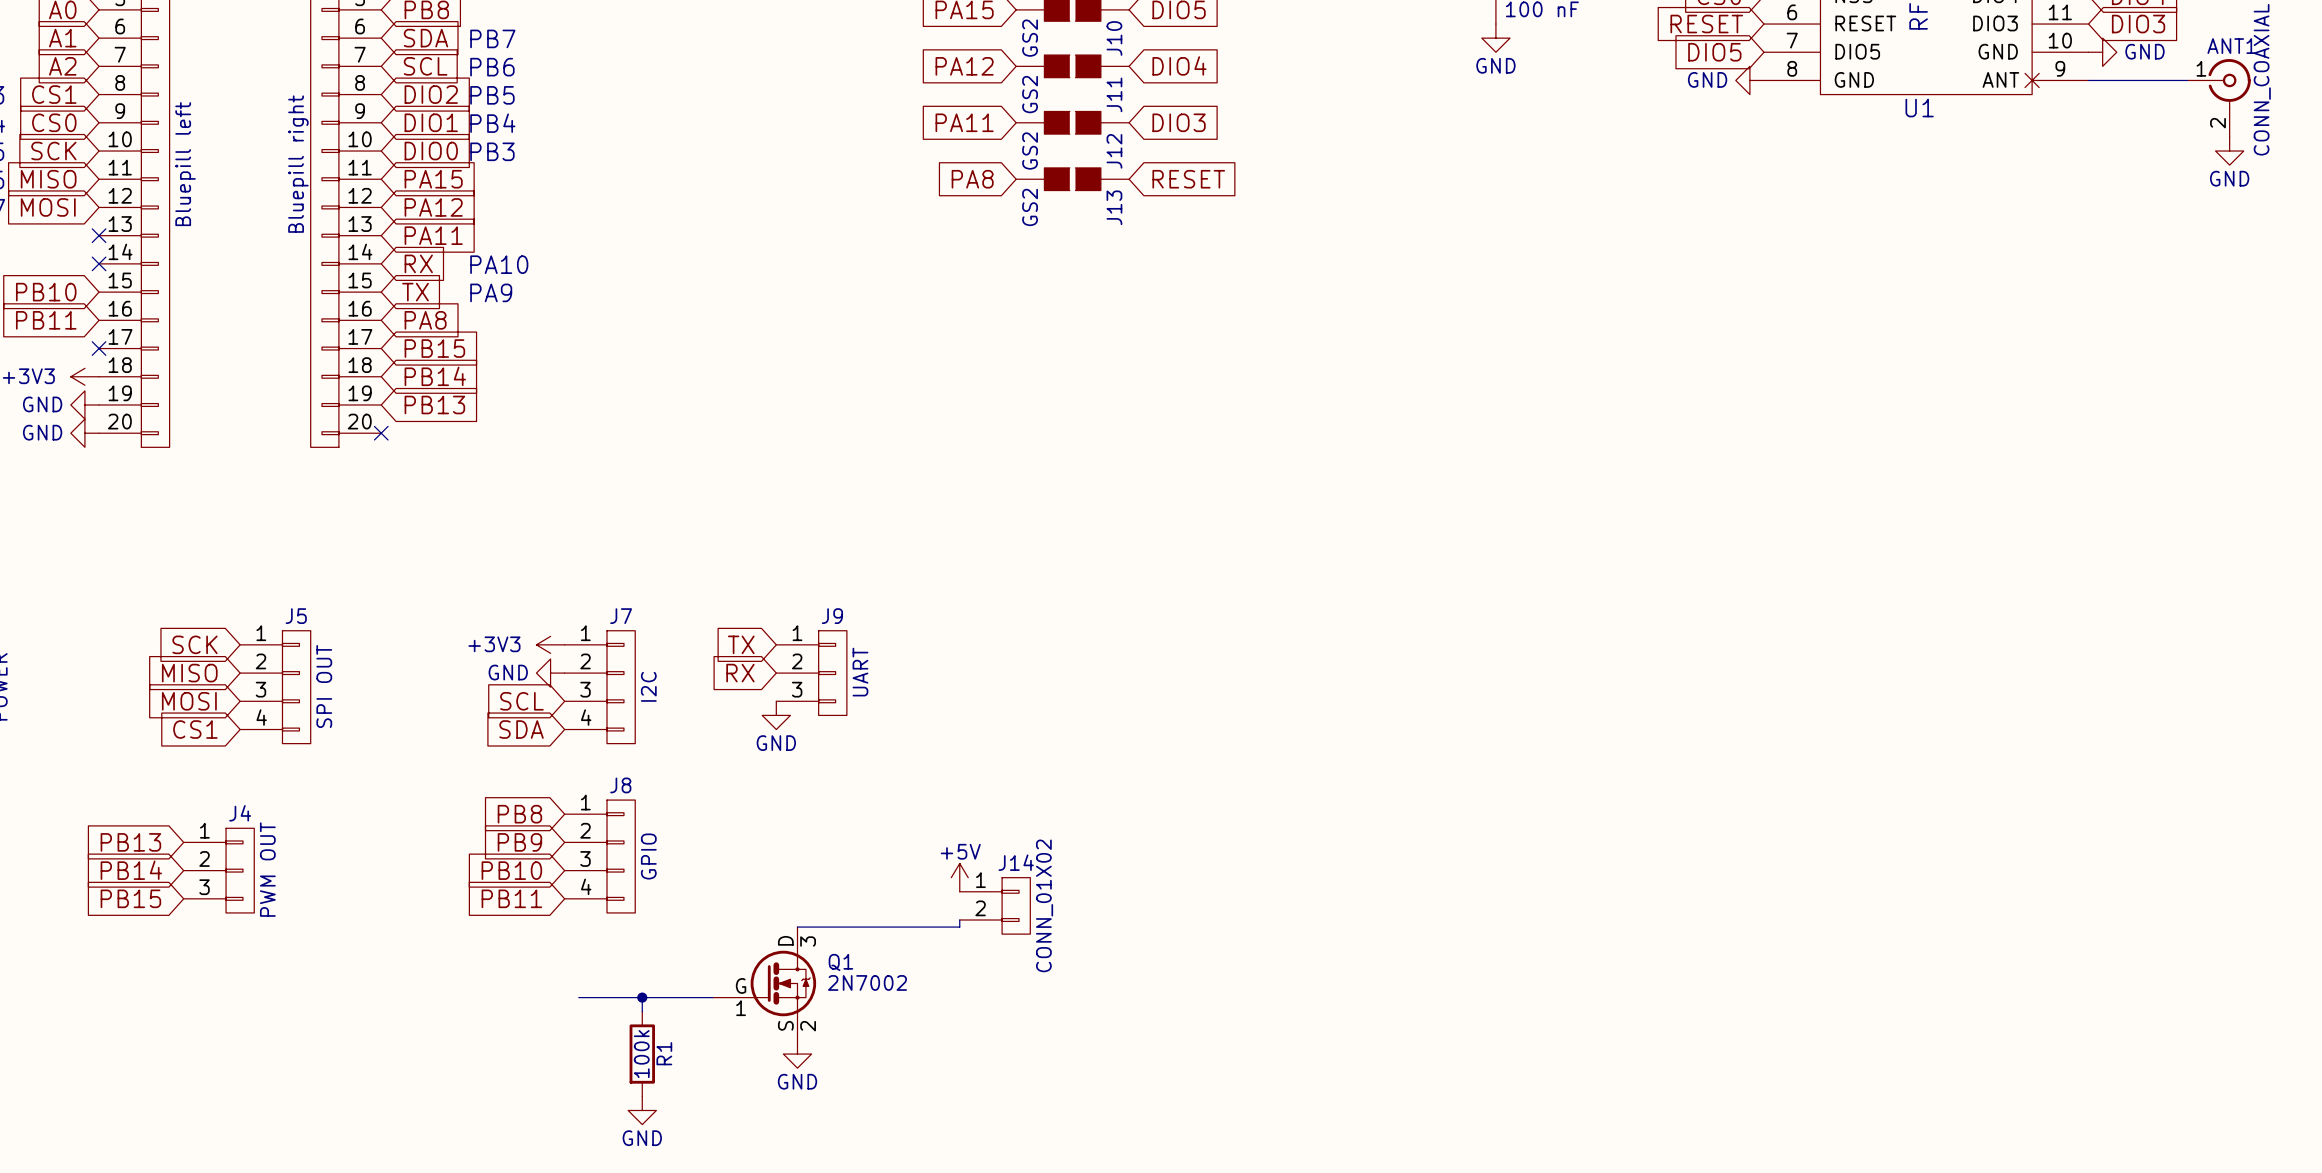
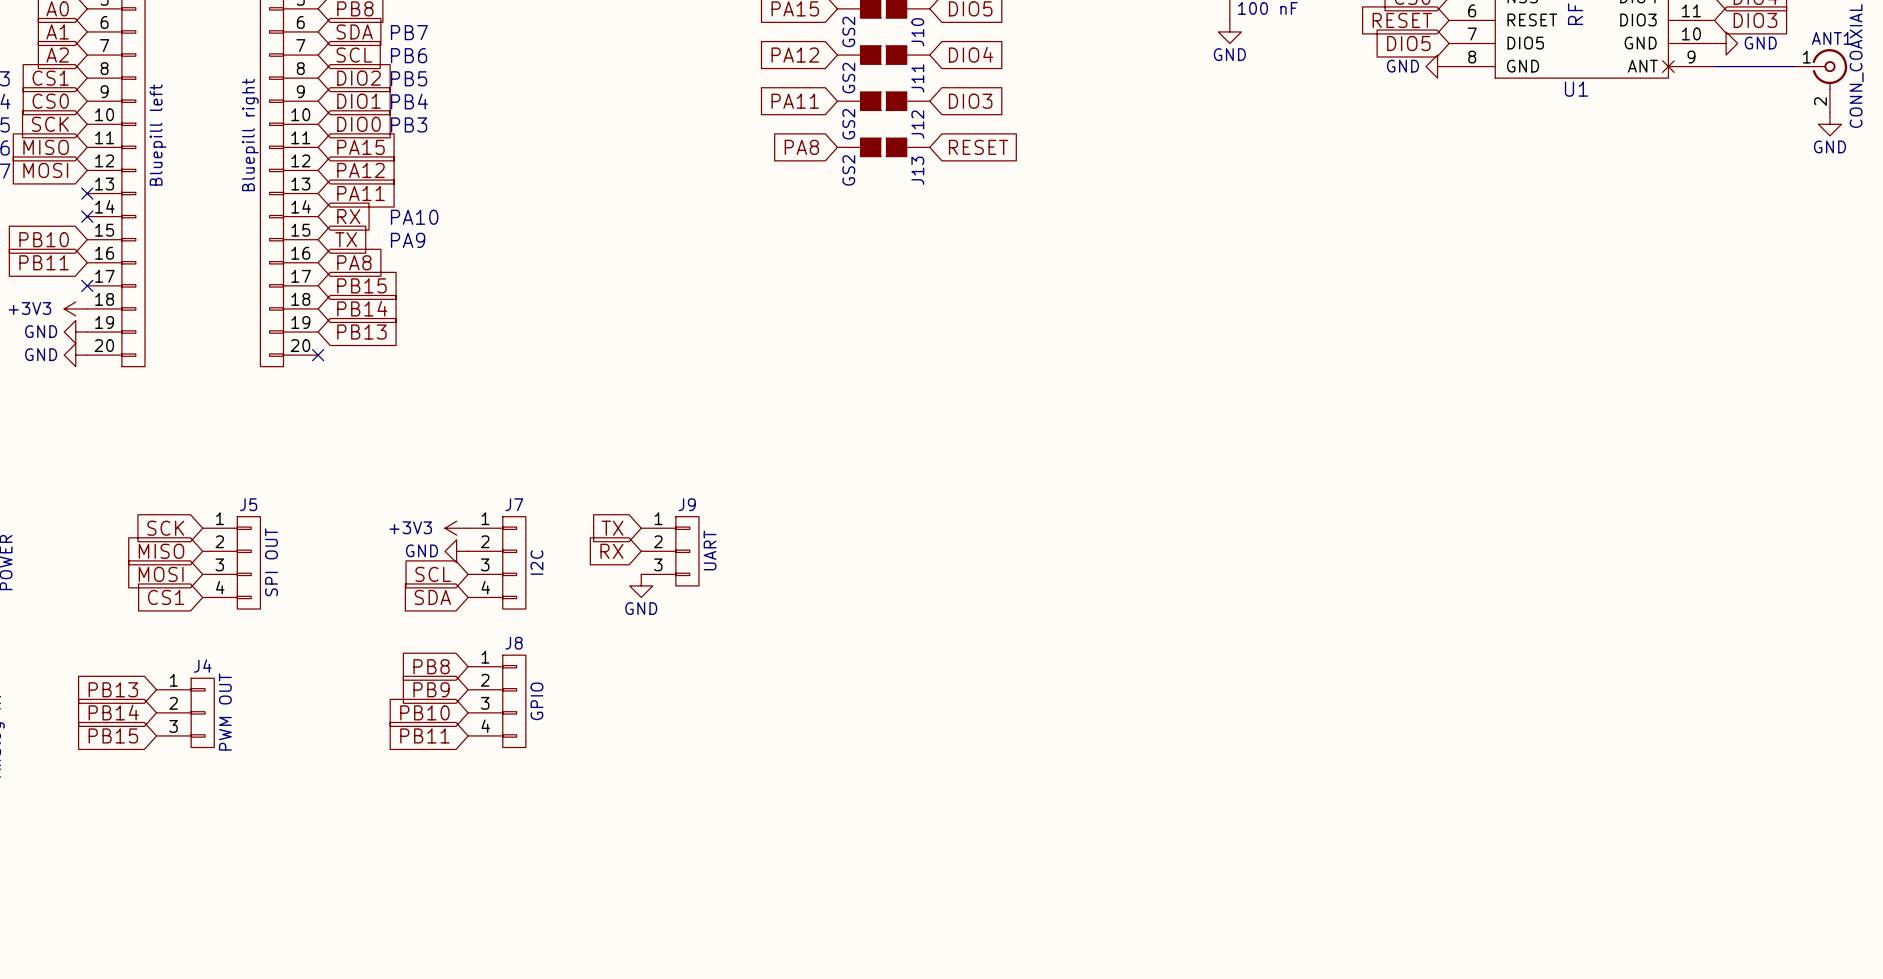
power symbol: +5V (959, 877) -> none
J14: CONN_01X02 (995, 905) -> none
wire: (959, 920) (959, 927) (797, 927) -> none
Q1: 2N7002 (764, 983) -> none
wire: (578, 997) (712, 997) -> none
wire: (642, 997) (642, 1011) -> none
junction: (642, 997) -> none
R1: 100k (642, 1054) -> none
power symbol: GND (797, 1054) -> none
power symbol: GND (642, 1110) -> none

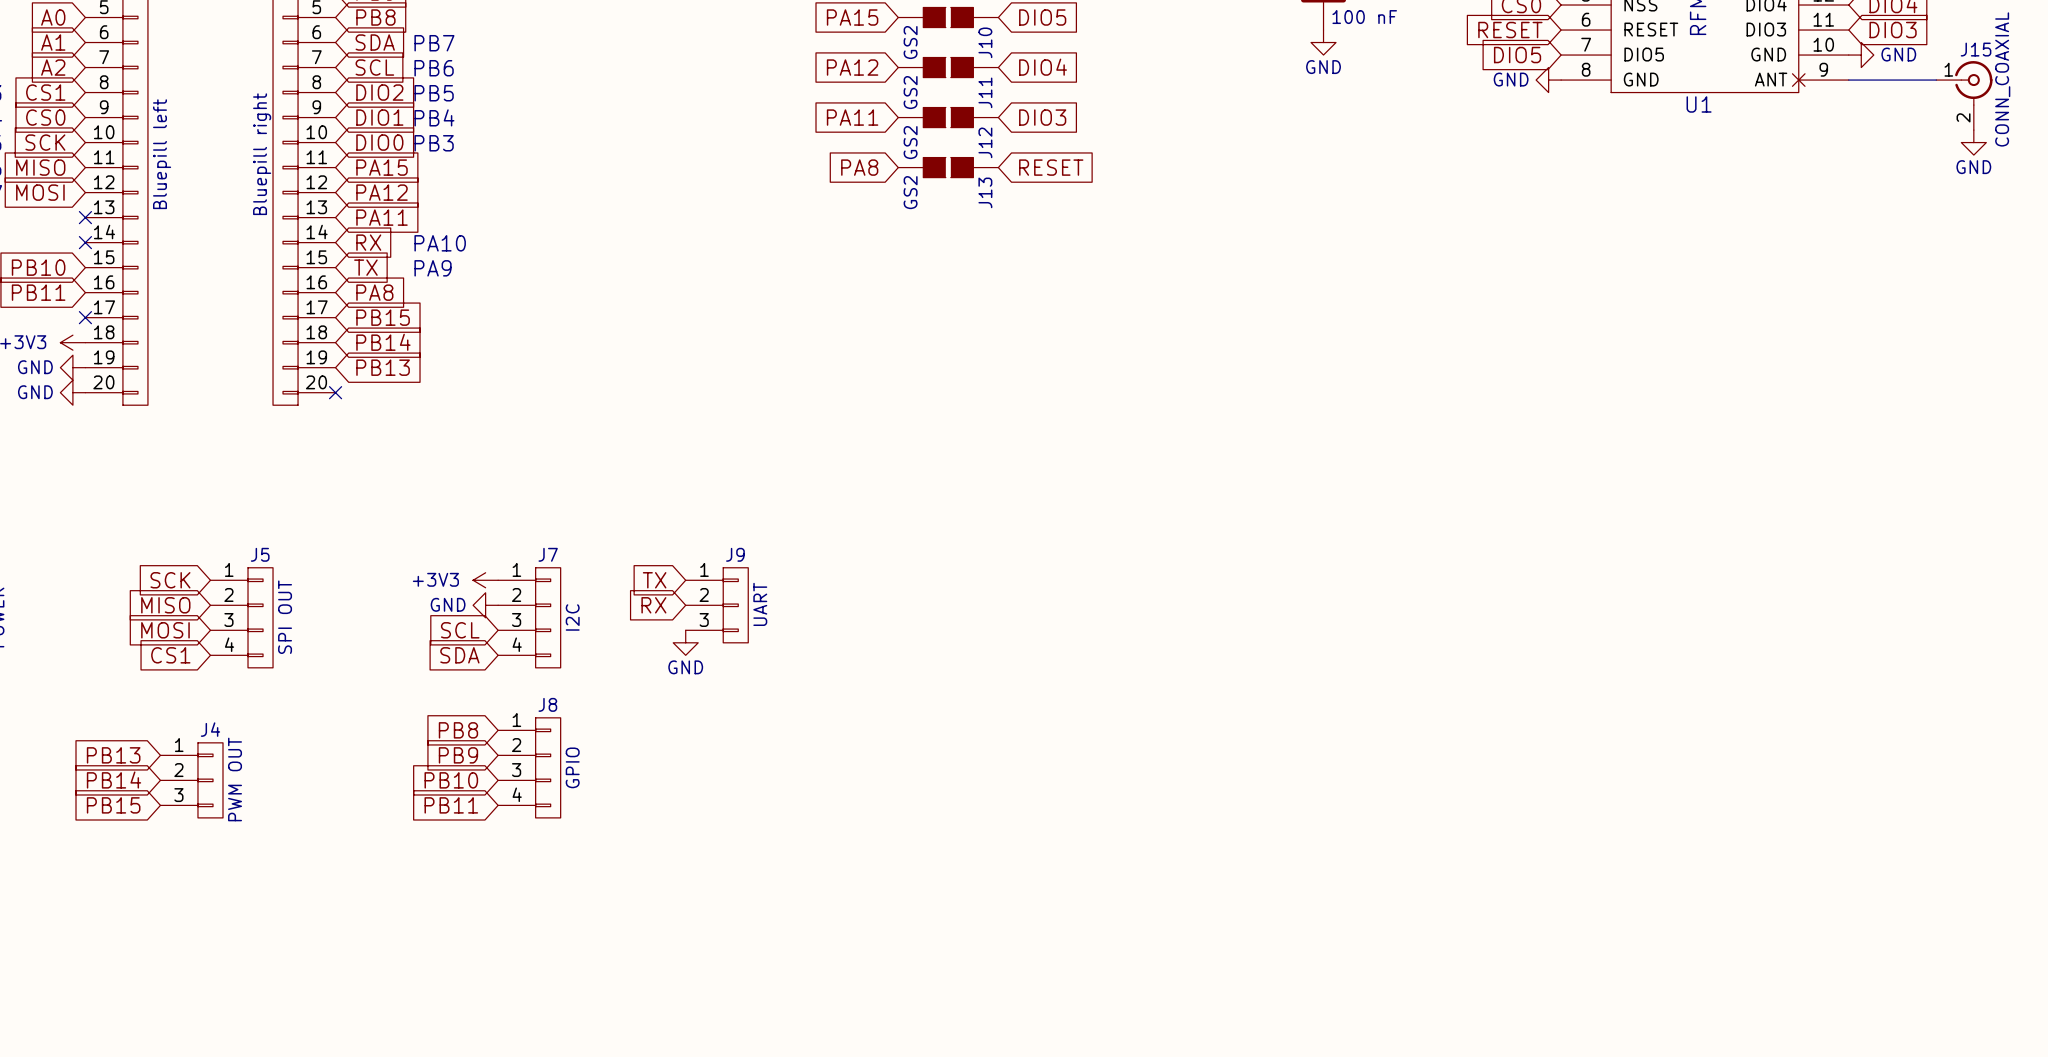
ANT1 name: ANT1 (1831, 38) -> J15 (1976, 49)

